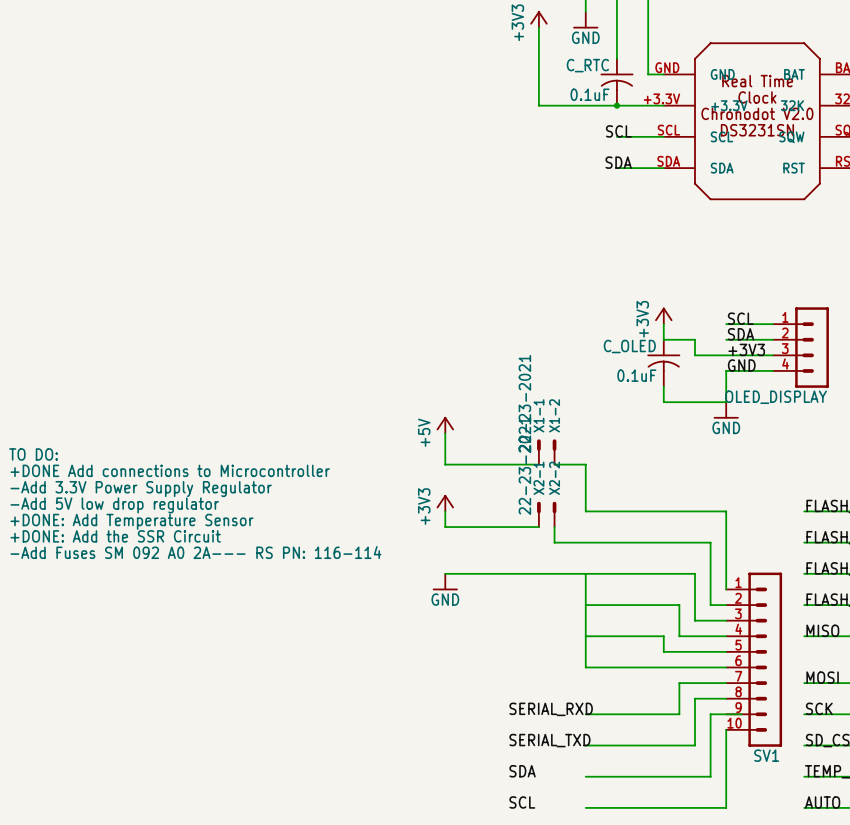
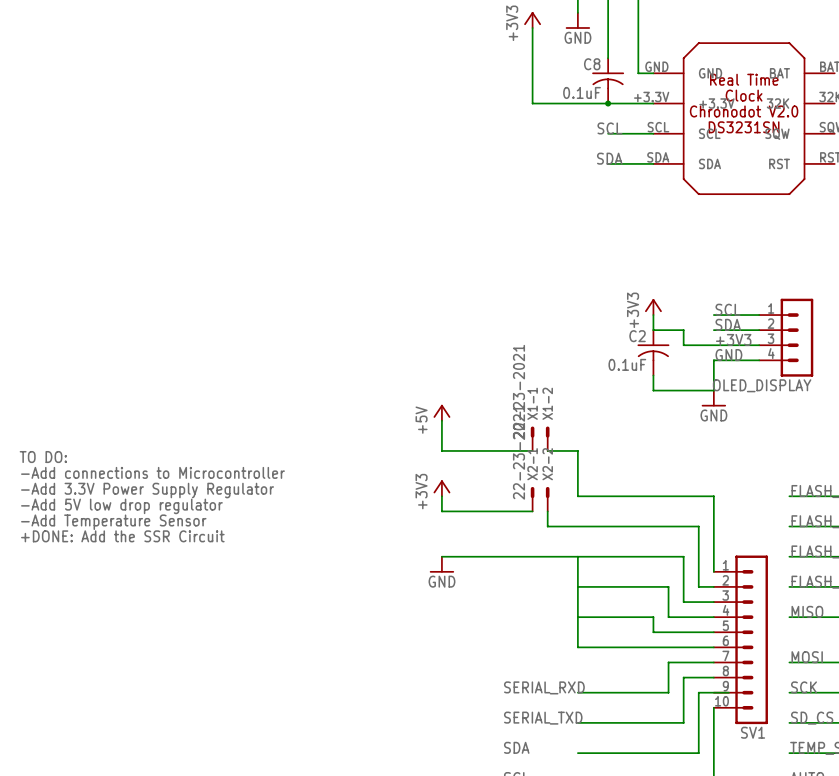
C_RTC name: C_RTC (587, 65) -> C8 (592, 64)
C_OLED name: C_OLED (629, 346) -> C2 (637, 336)
text: TO DO: (33, 454) -> none
text: +DONE Add connections to Microcontroller (170, 470) -> TO DO: (43, 457)
text: -Add 3.3V Power Supply Regulator (141, 489) -> -Add connections to Microcontroller (152, 472)
text: -Add 5V low drop regulator (114, 505) -> -Add 3.3V Power Supply Regulator (147, 490)
text: +DONE: Add Temperature Sensor (132, 521) -> -Add 5V low drop regulator (121, 506)
text: +DONE: Add the SSR Circuit (115, 536) -> -Add Temperature Sensor (113, 522)
text: -Add Fuses SM 092 A0 2A--- RS PN: 116-114 (195, 552) -> +DONE: Add the SSR Circuit (122, 536)

